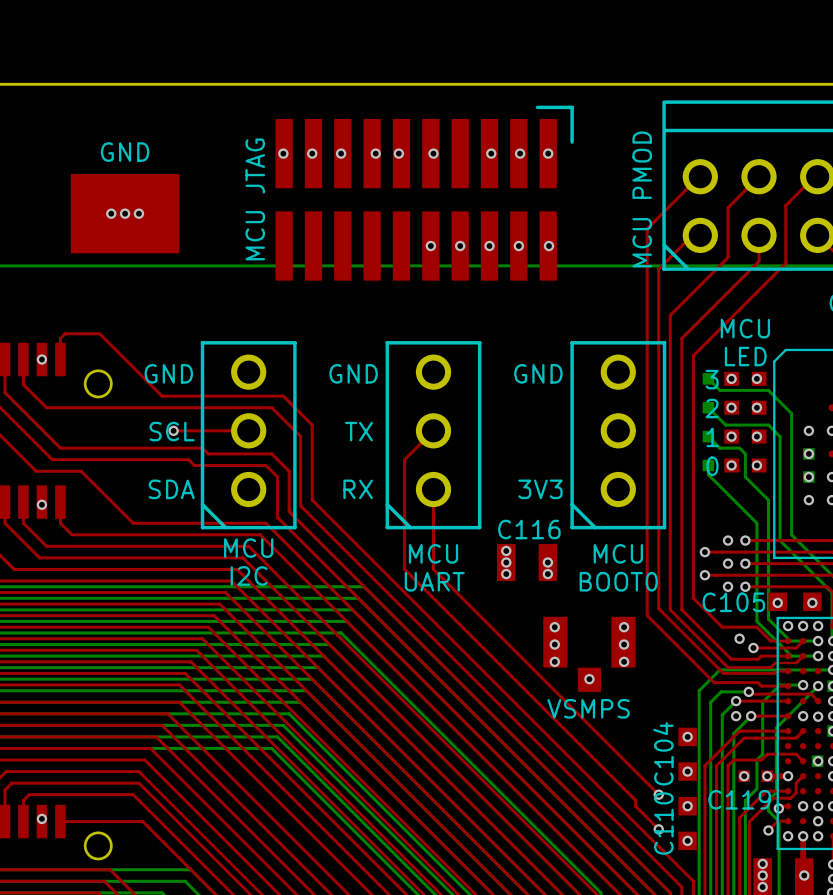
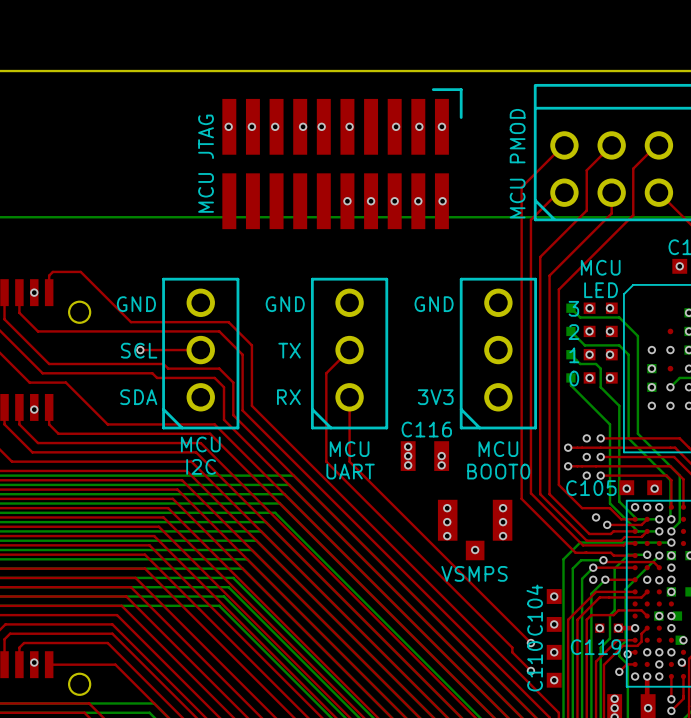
text: GND (125, 152) -> none
via: (111, 213) -> none
part: (125, 213) -> none
via: (125, 213) -> none
via: (138, 213) -> none

